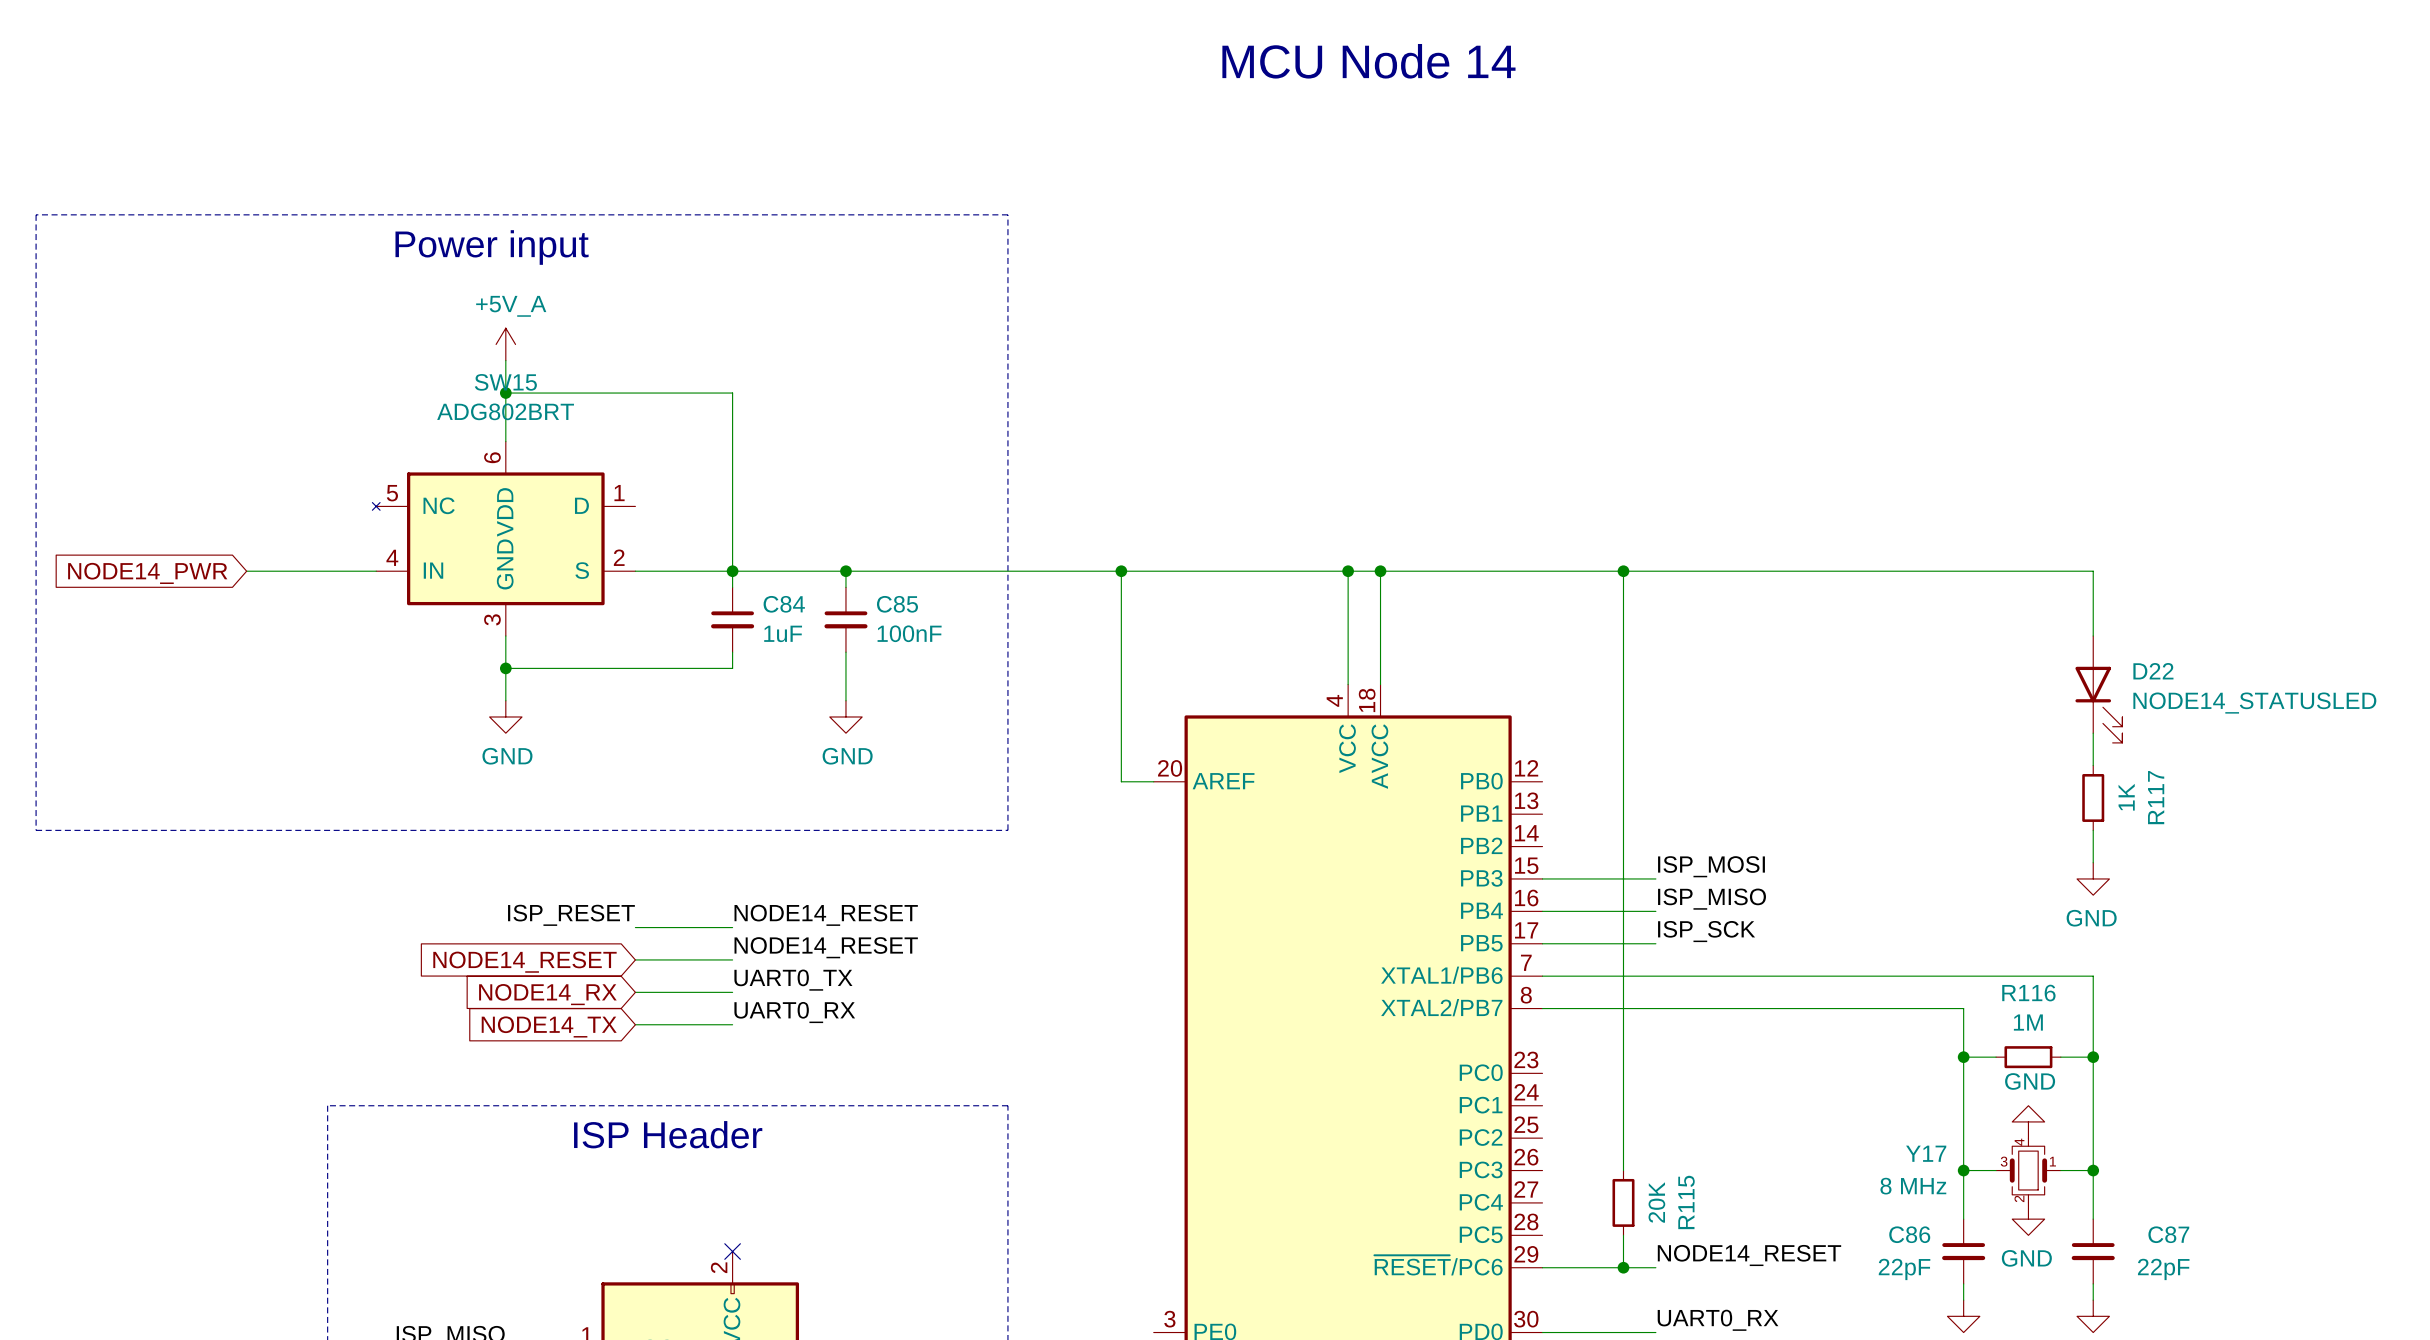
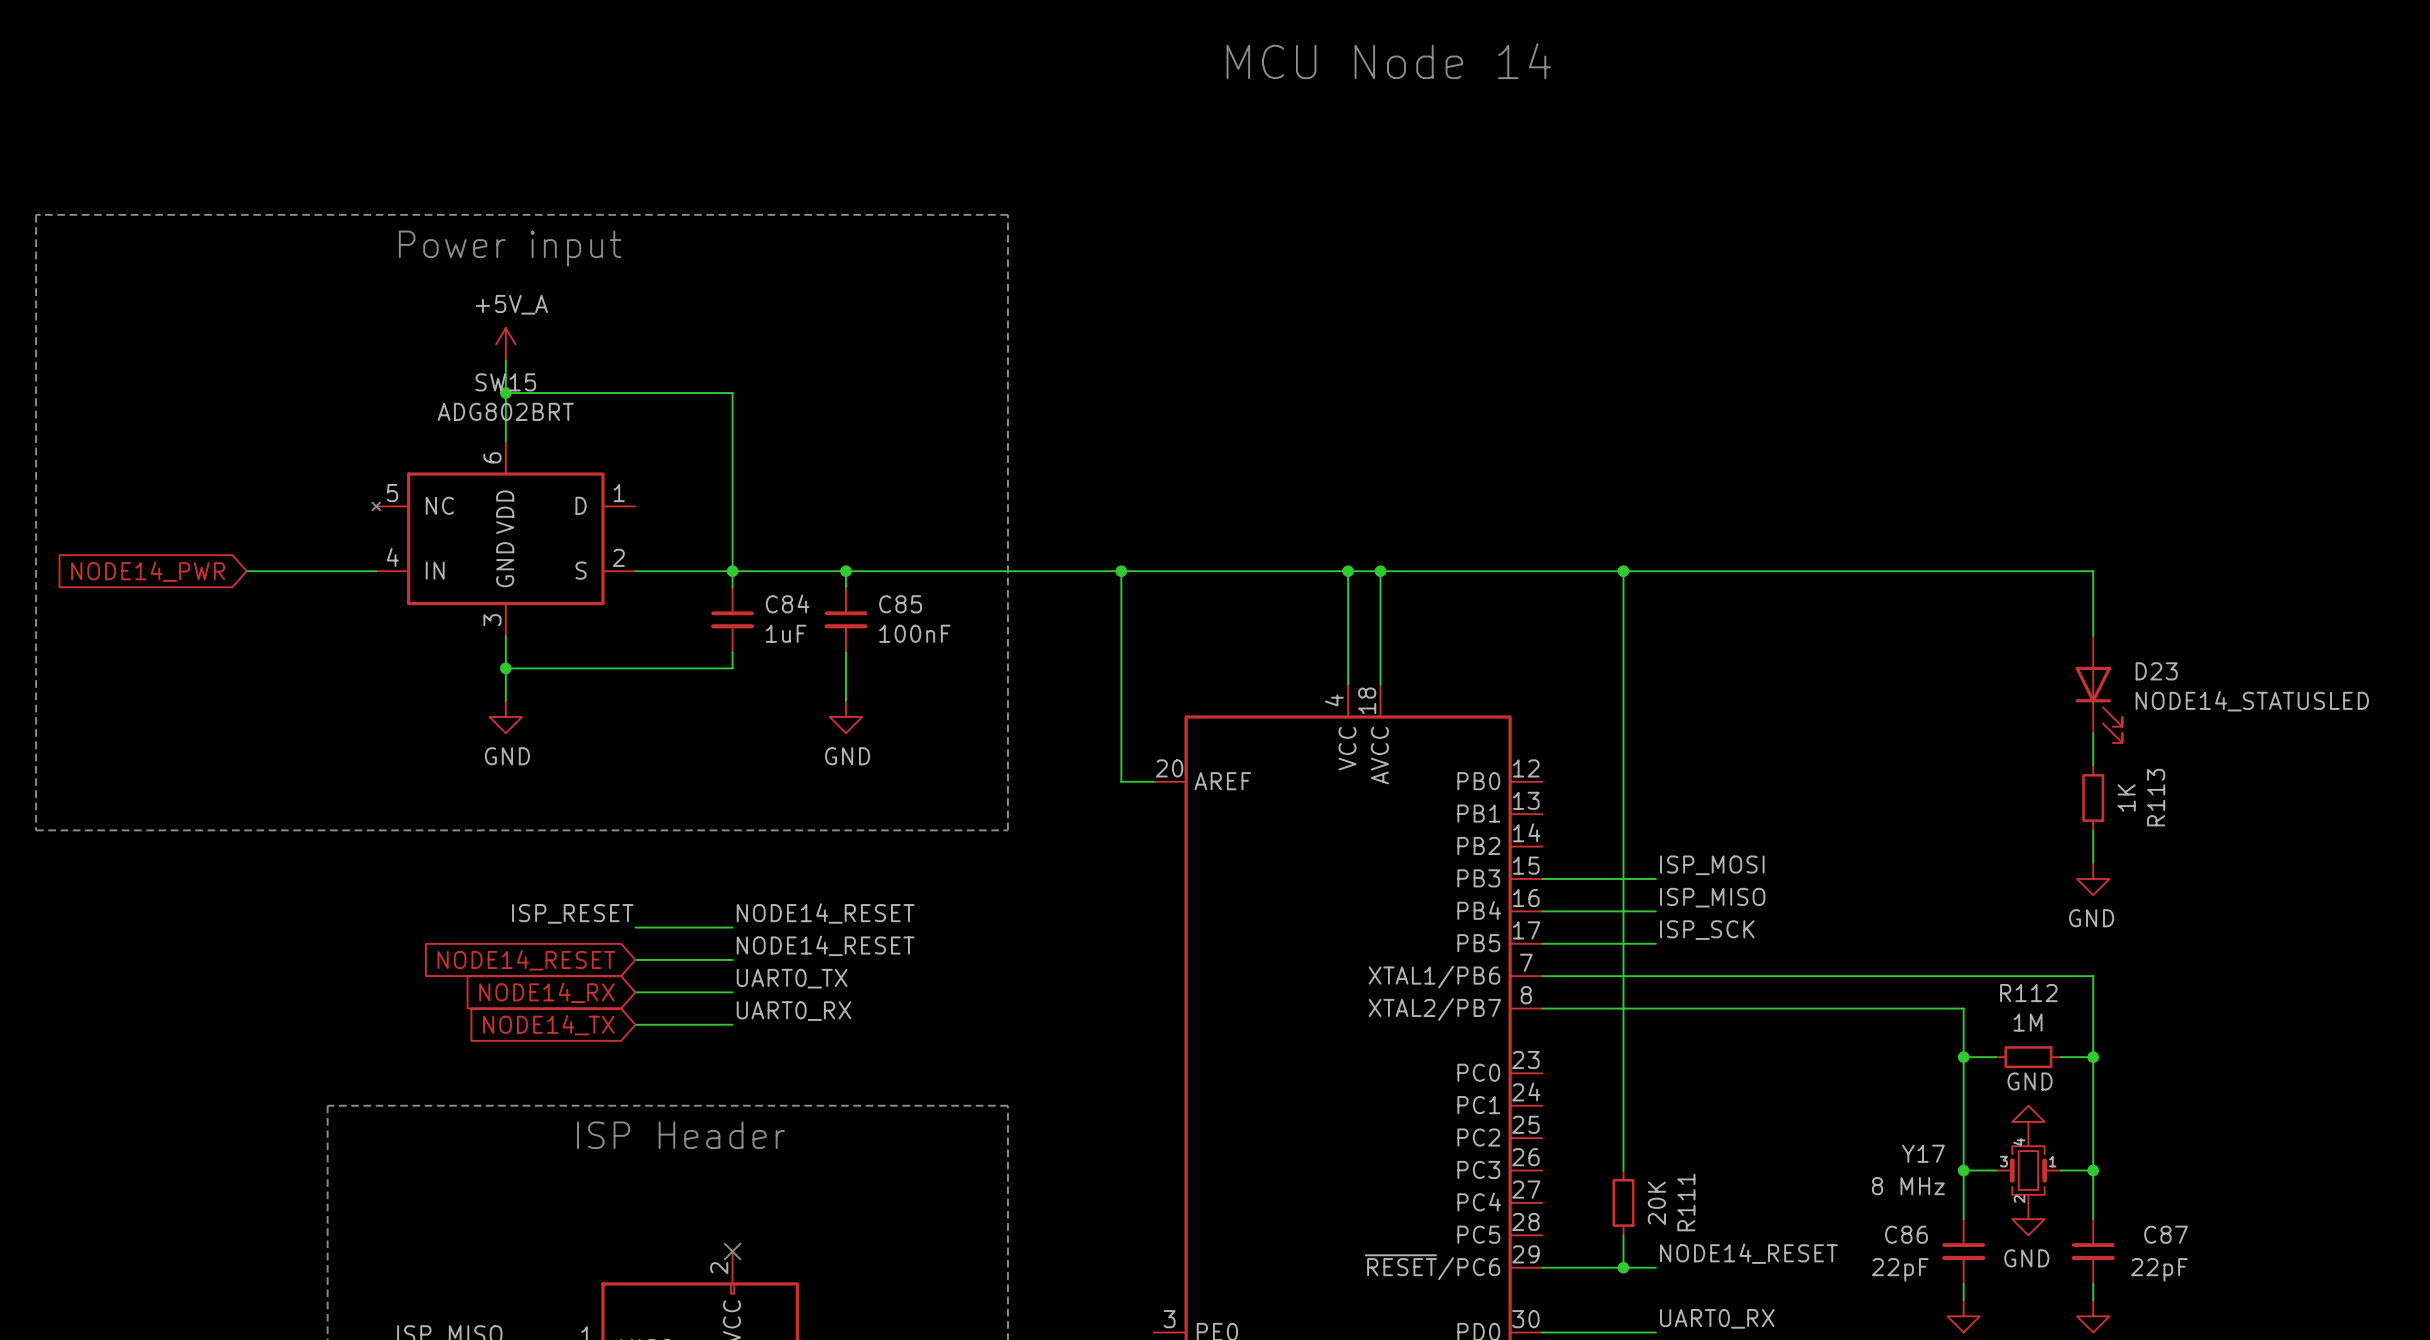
D22 name: D22 (2153, 671) -> D23 (2156, 671)
R117 name: R117 (2156, 797) -> R113 (2156, 797)
R116 name: R116 (2028, 993) -> R112 (2028, 993)
R115 name: R115 (1686, 1202) -> R111 (1686, 1202)

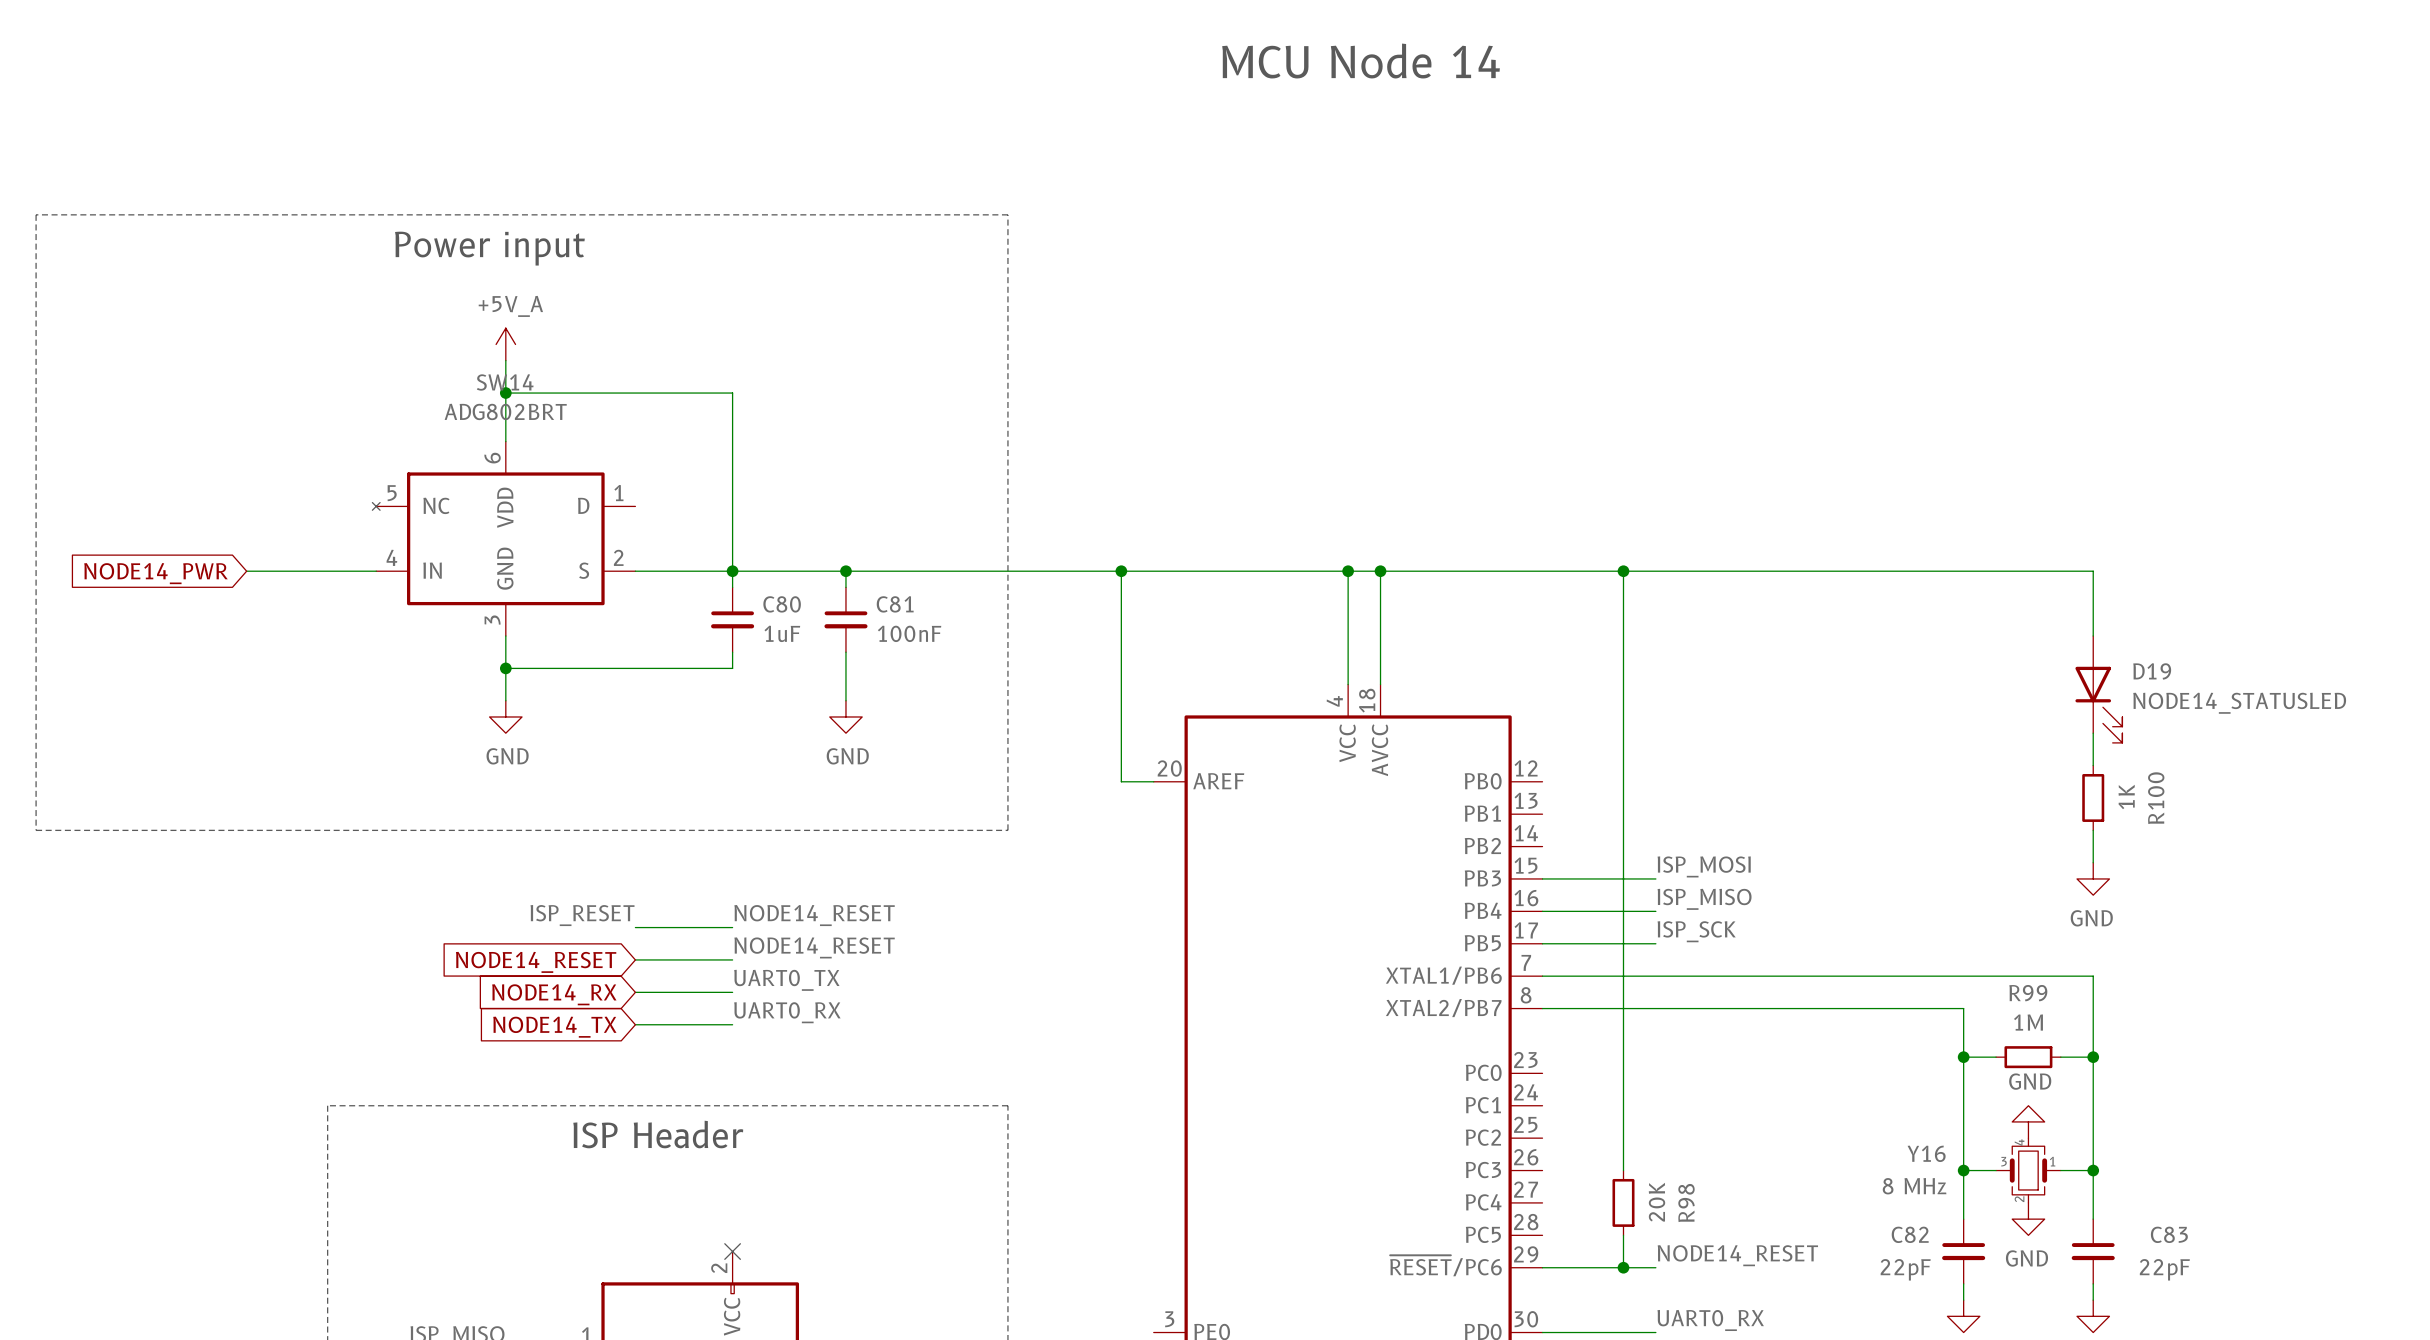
SW15 name: SW15 (505, 382) -> SW14 (505, 382)
C84 name: C84 (787, 603) -> C80 (782, 604)
C85 name: C85 (900, 604) -> C81 (895, 604)
D23 name: D23 (2156, 671) -> D19 (2152, 671)
R113 name: R113 (2156, 797) -> R100 (2156, 798)
R112 name: R112 (2028, 993) -> R99 (2028, 993)
Y17 name: Y17 (1923, 1153) -> Y16 (1926, 1153)
R111 name: R111 (1686, 1202) -> R98 (1686, 1203)
C86 name: C86 (1906, 1234) -> C82 (1910, 1234)
C87 name: C87 (2166, 1234) -> C83 (2169, 1234)

